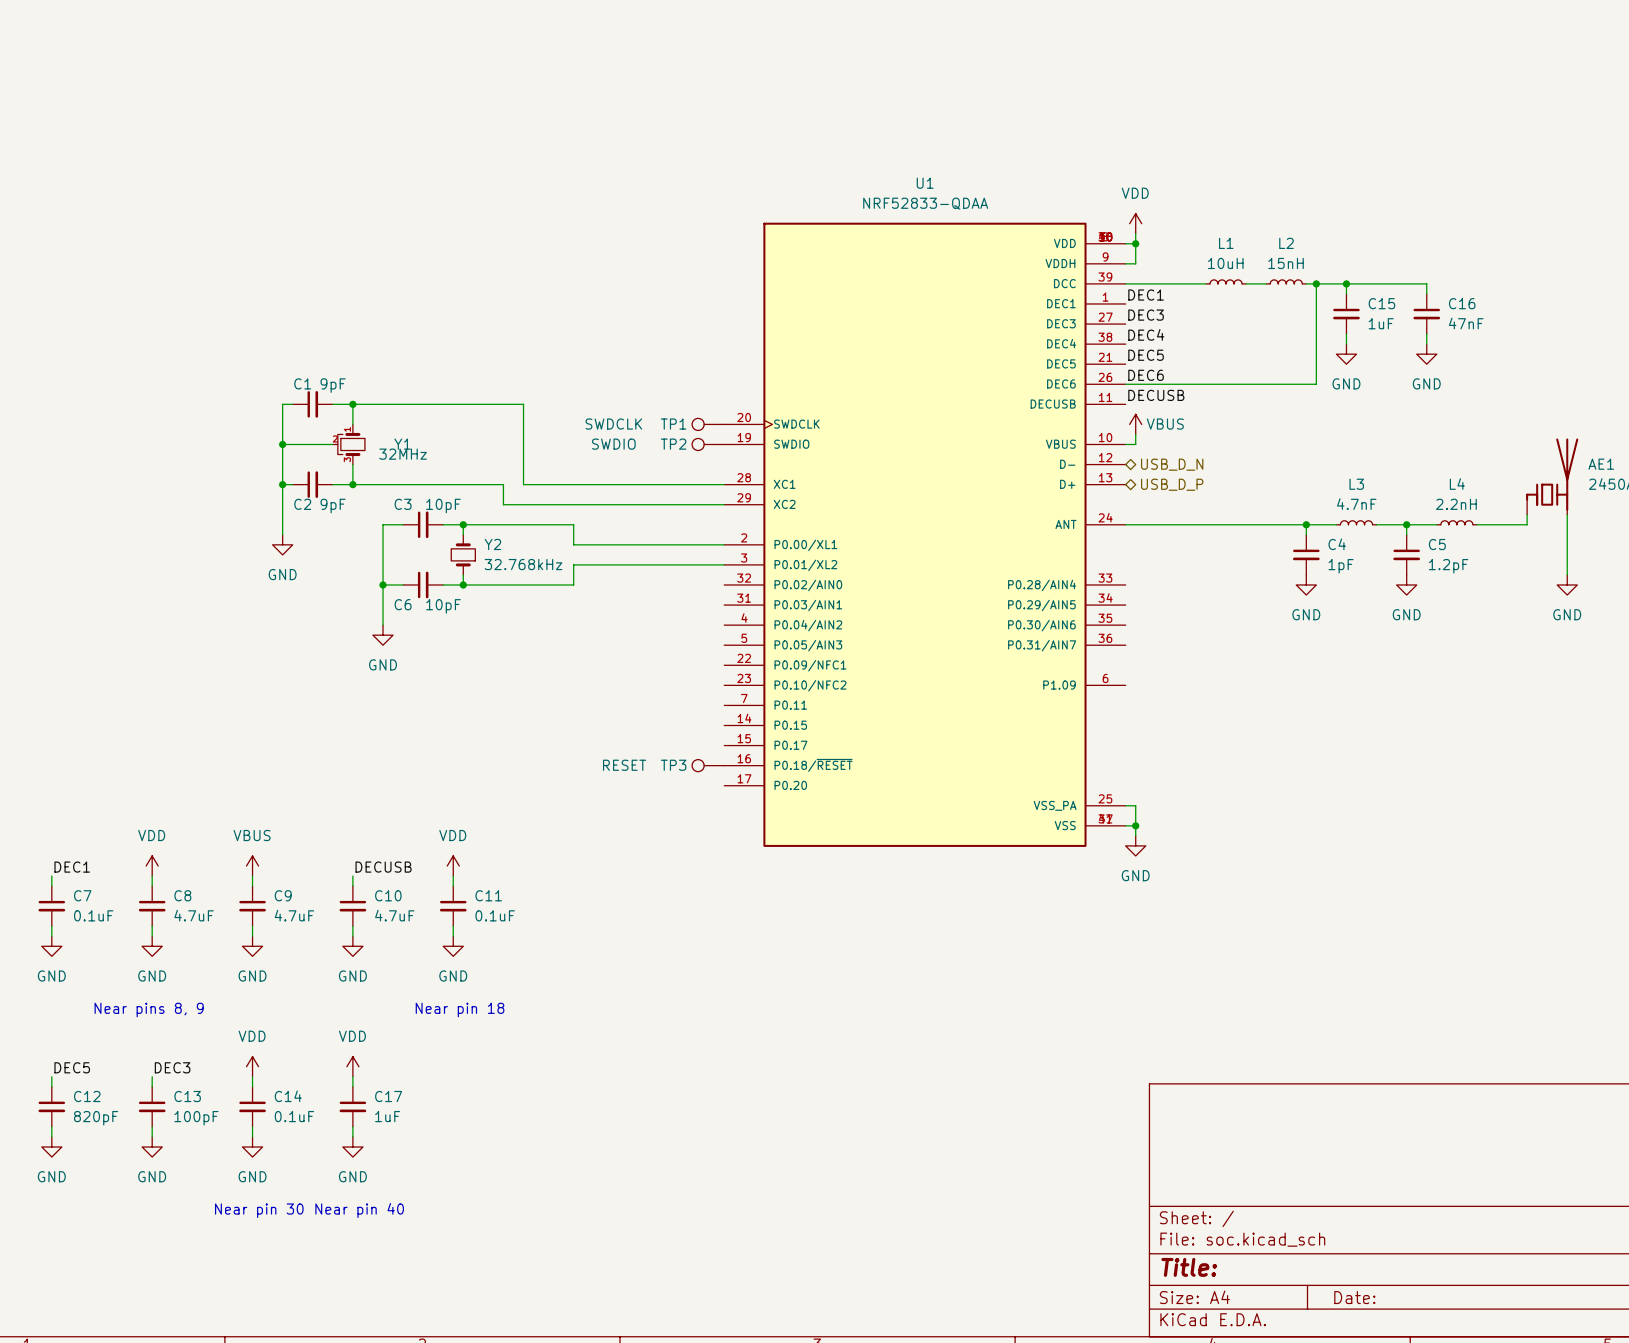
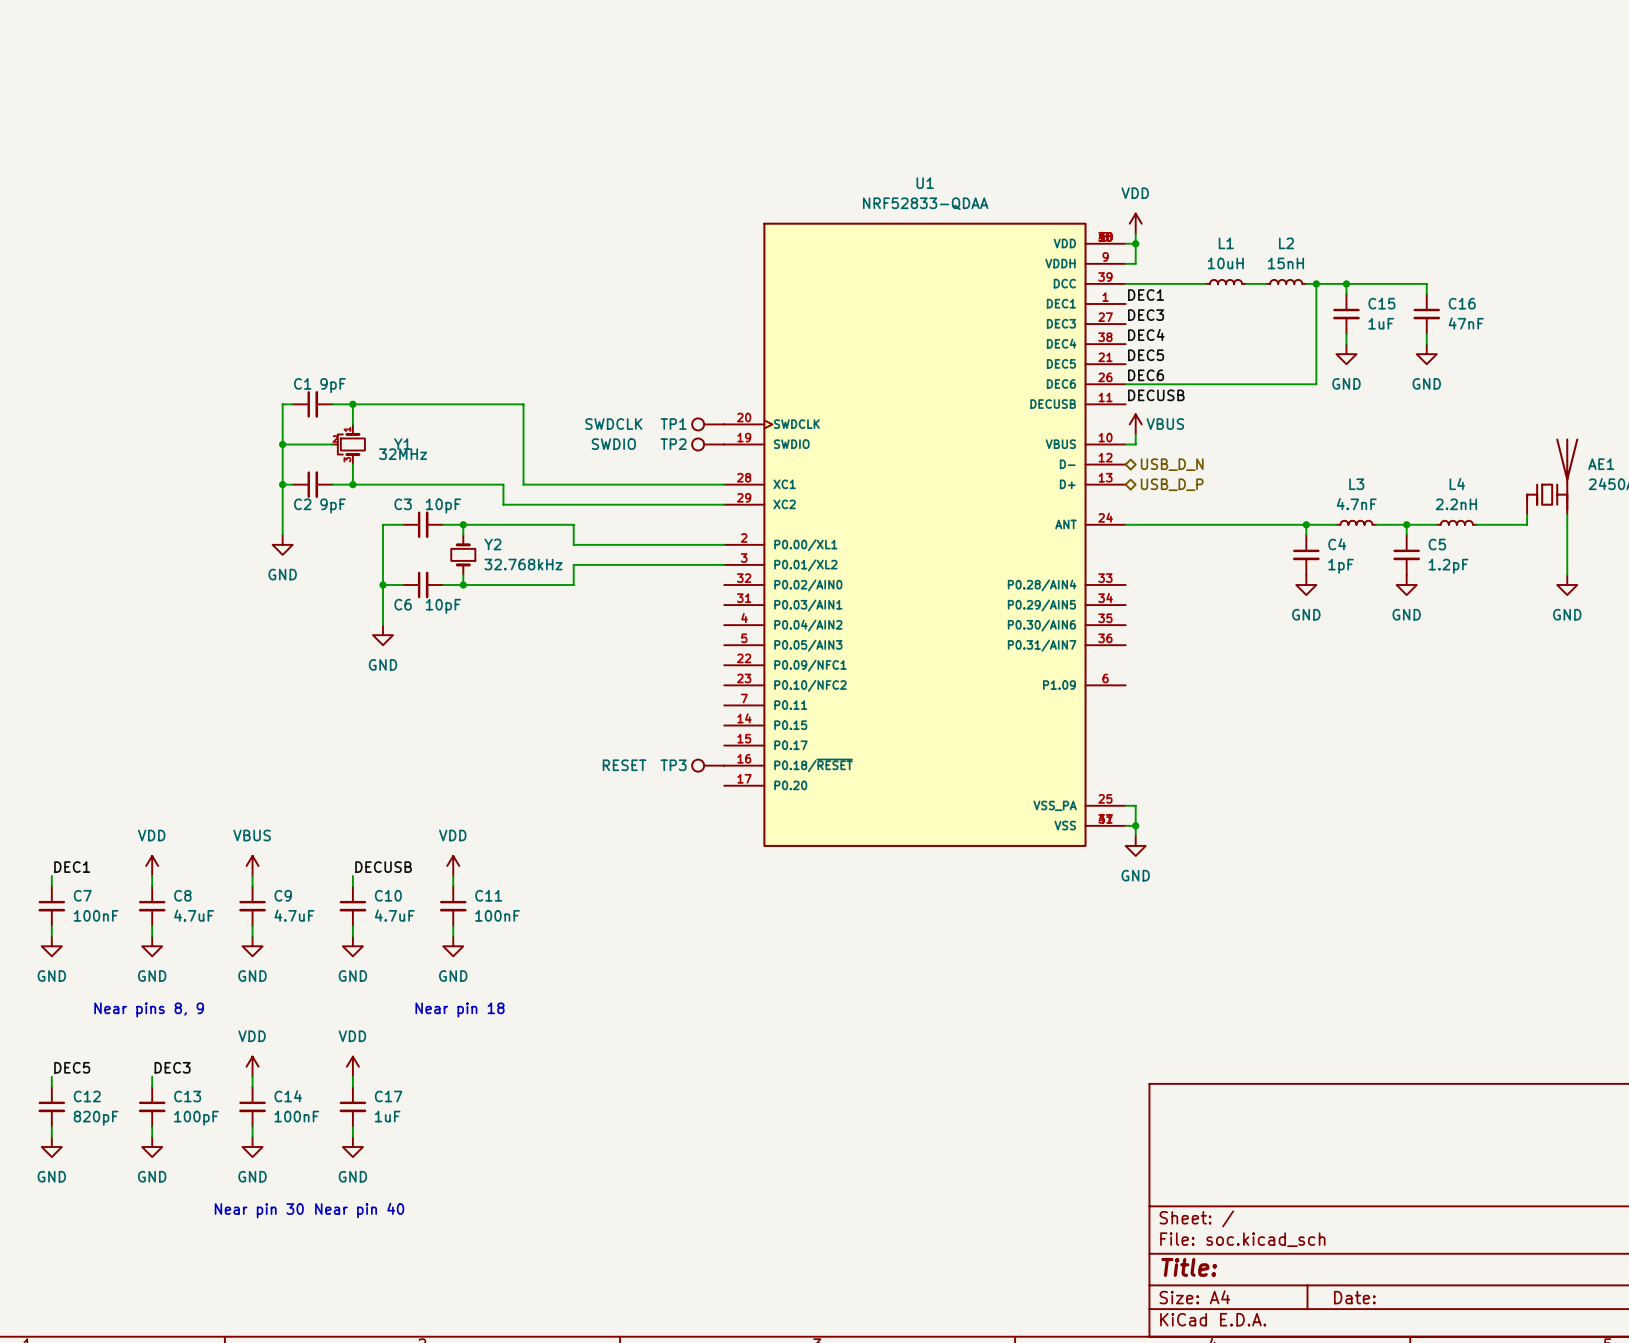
C7 value: 0.1uF (93, 915) -> 100nF (96, 915)
C11 value: 0.1uF (495, 915) -> 100nF (497, 915)
C14 value: 0.1uF (294, 1116) -> 100nF (296, 1116)

